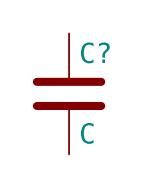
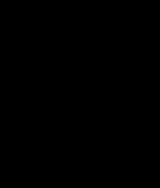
C?: C (69, 93) -> none

